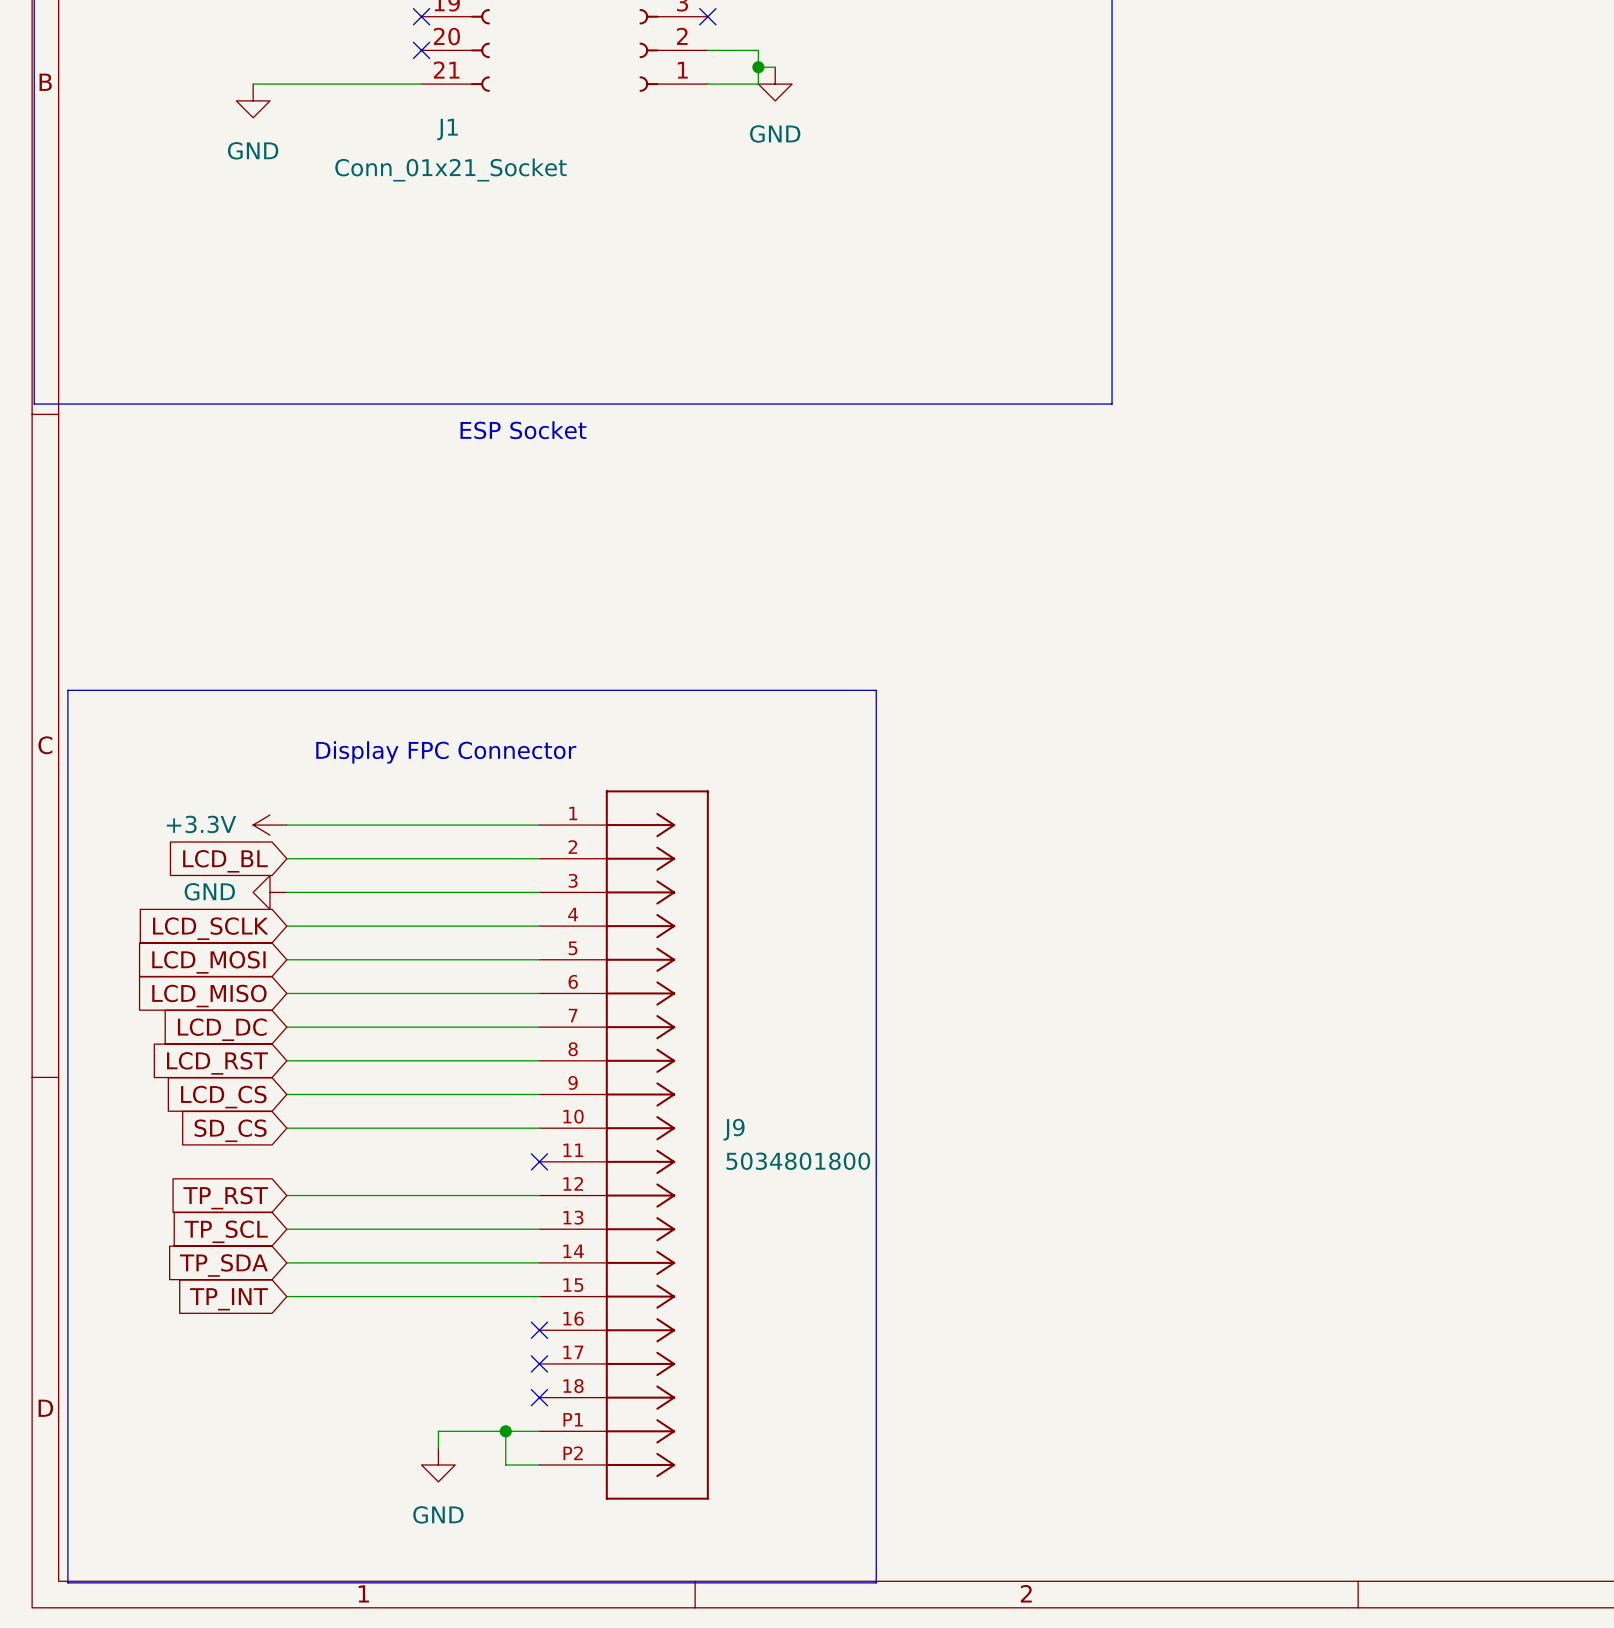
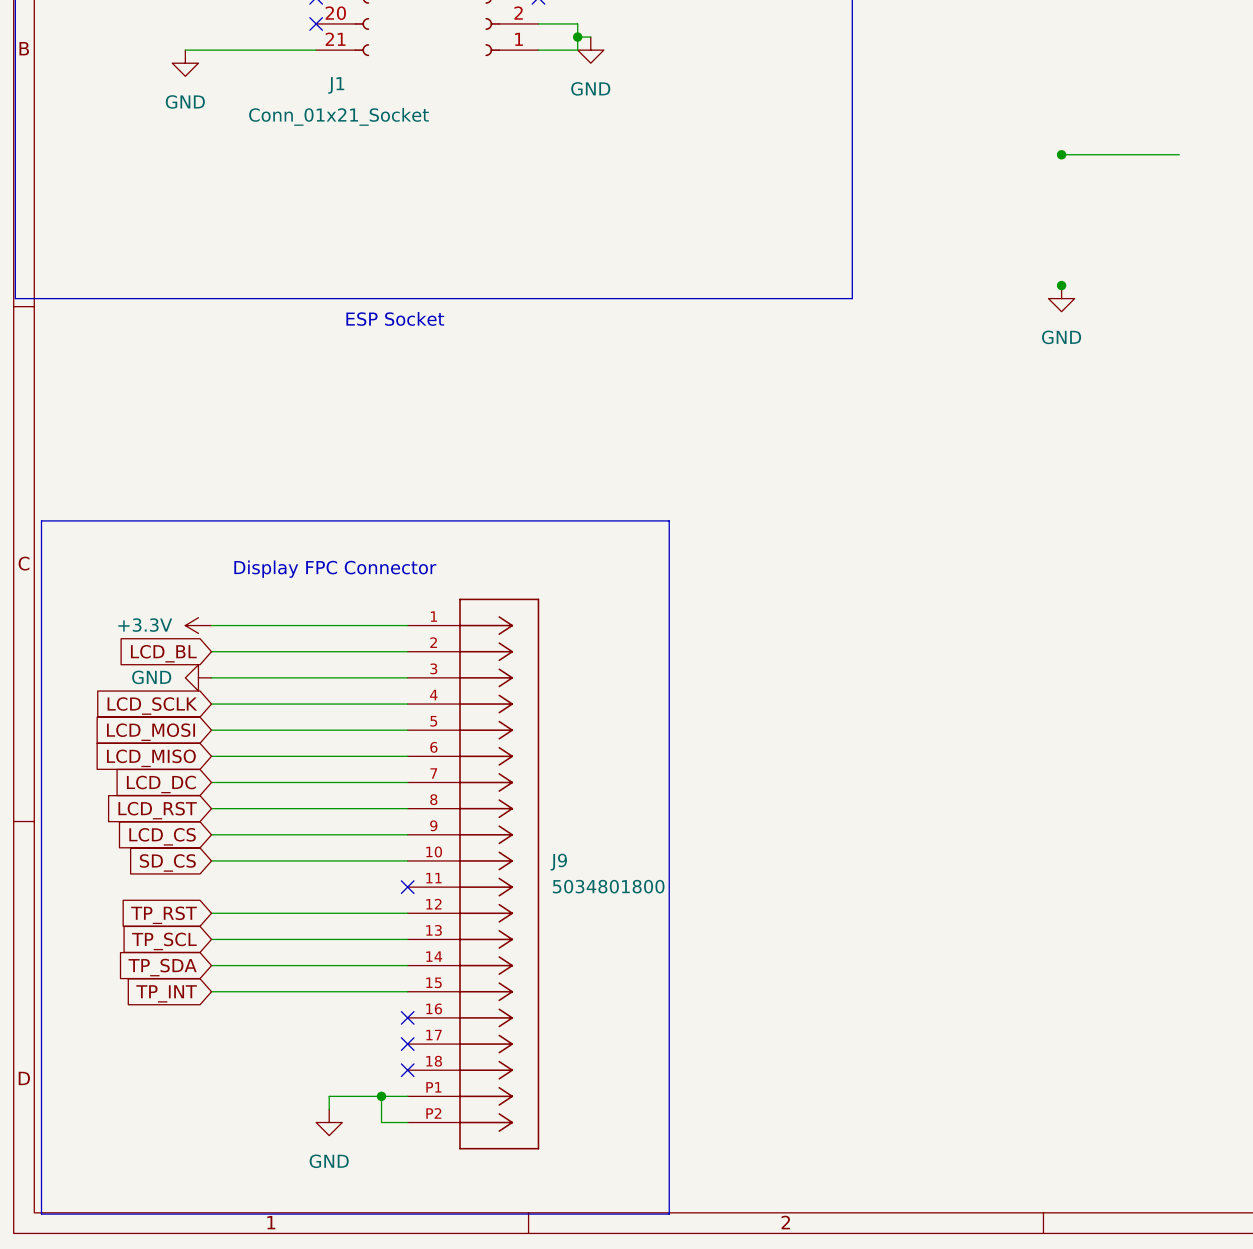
wire: none -> (1061, 154) (1179, 154)
junction: none -> (1061, 154)
junction: none -> (1061, 285)
power symbol: none -> GND (1061, 298)

